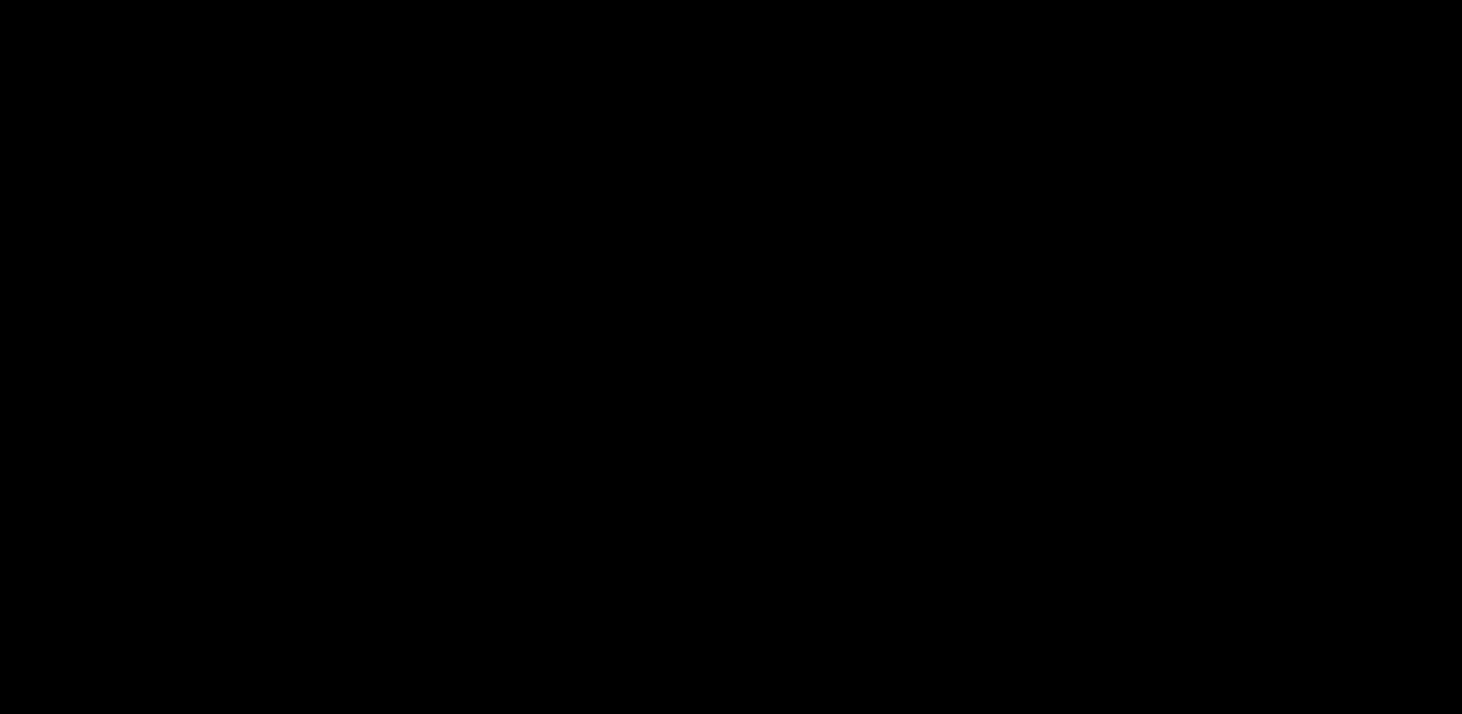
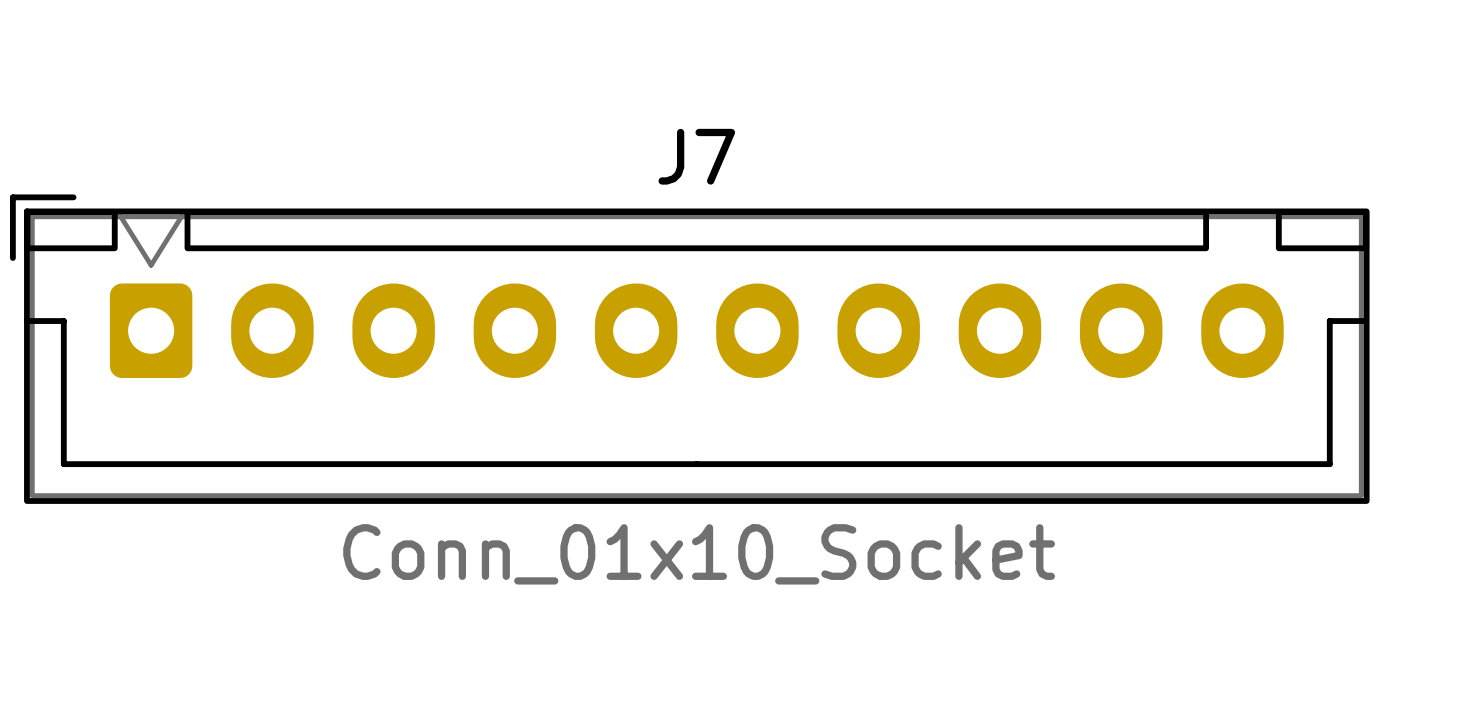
J7: none -> Conn_01x10_Socket (689, 349)

